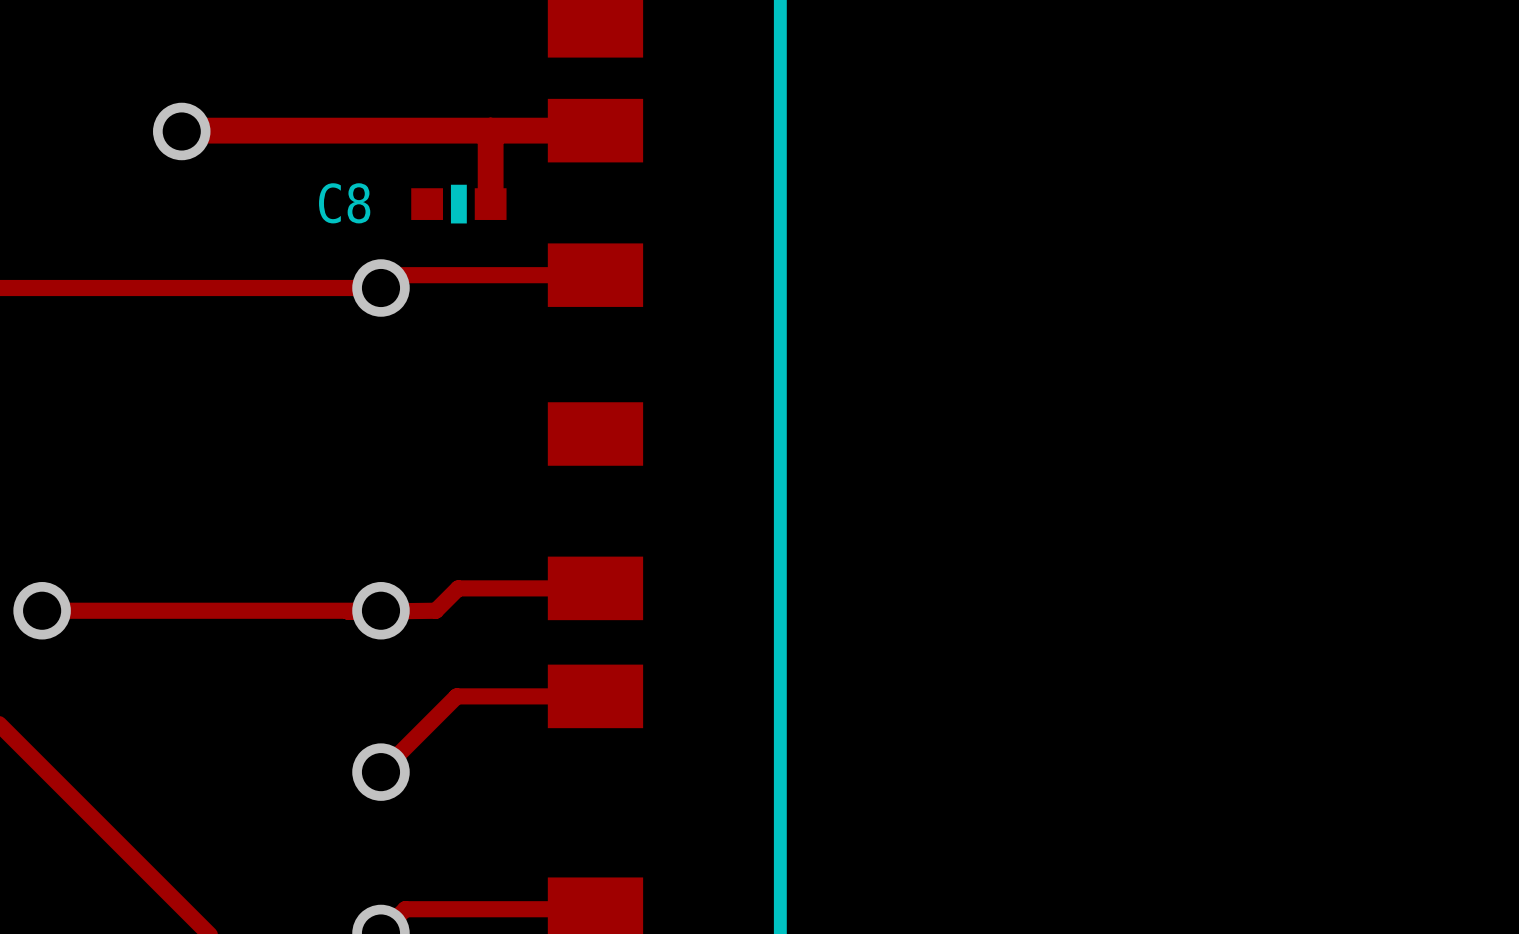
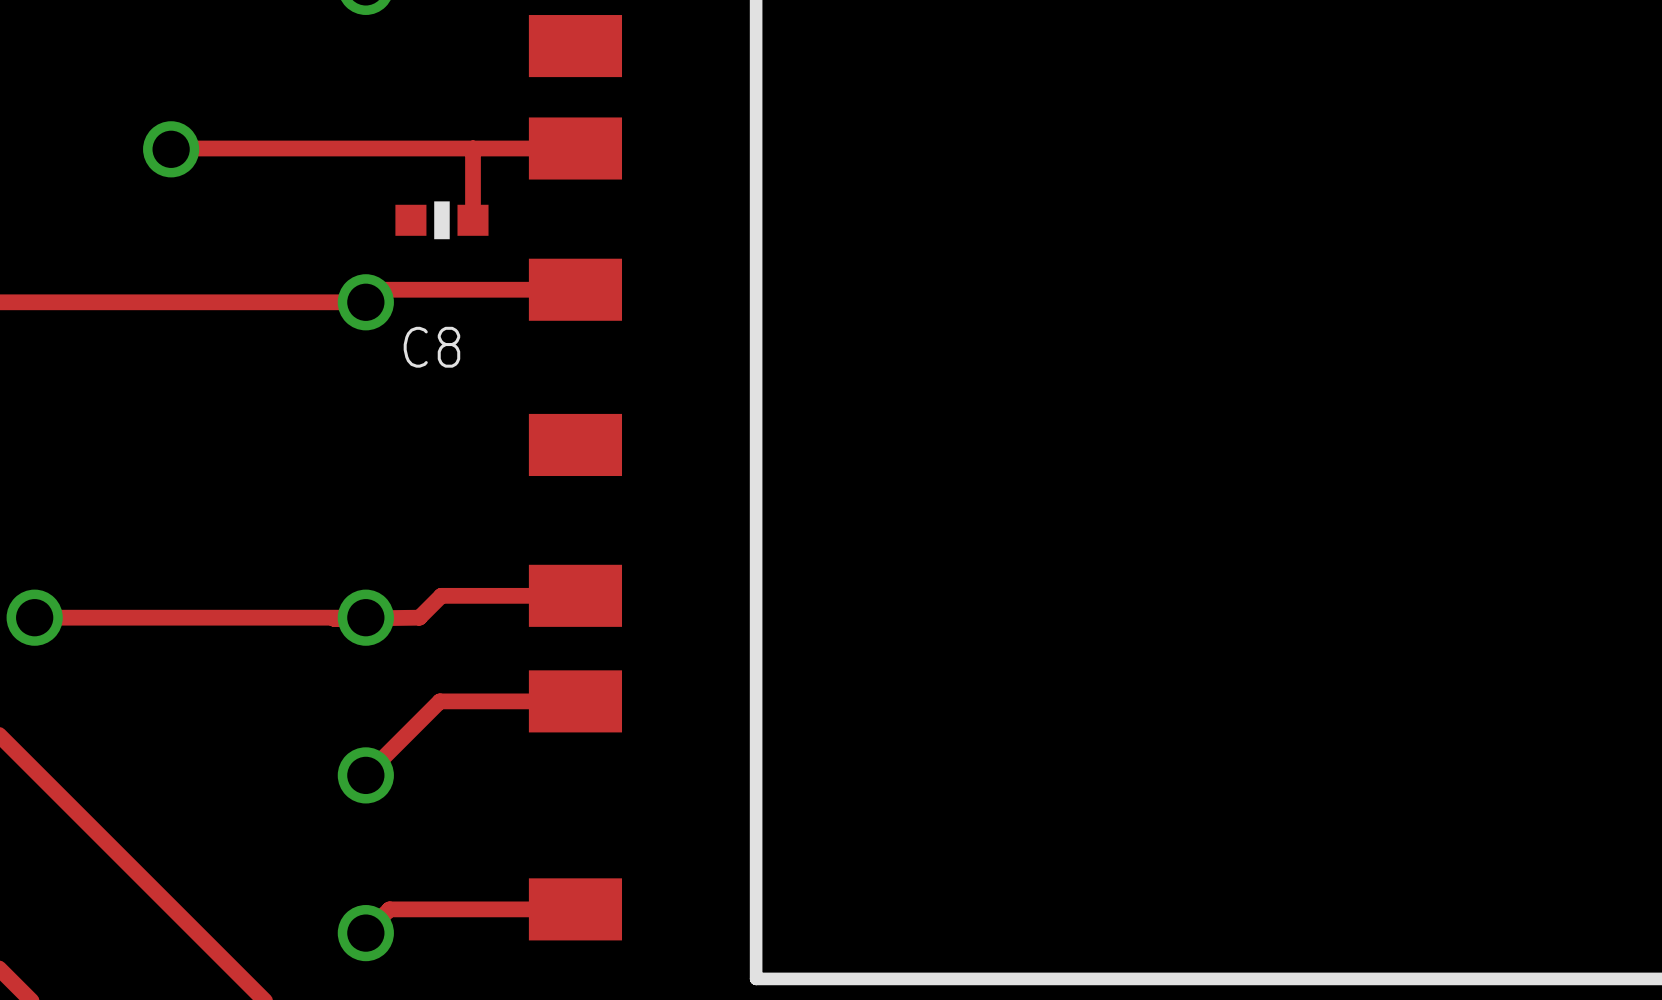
track width: thick (181, 130) (595, 130) -> thin (171, 148) (575, 148)
track width: thick (490, 130) (490, 204) -> thin (473, 148) (473, 220)
C8 name position: C8 (344, 203) -> C8 (431, 347)

